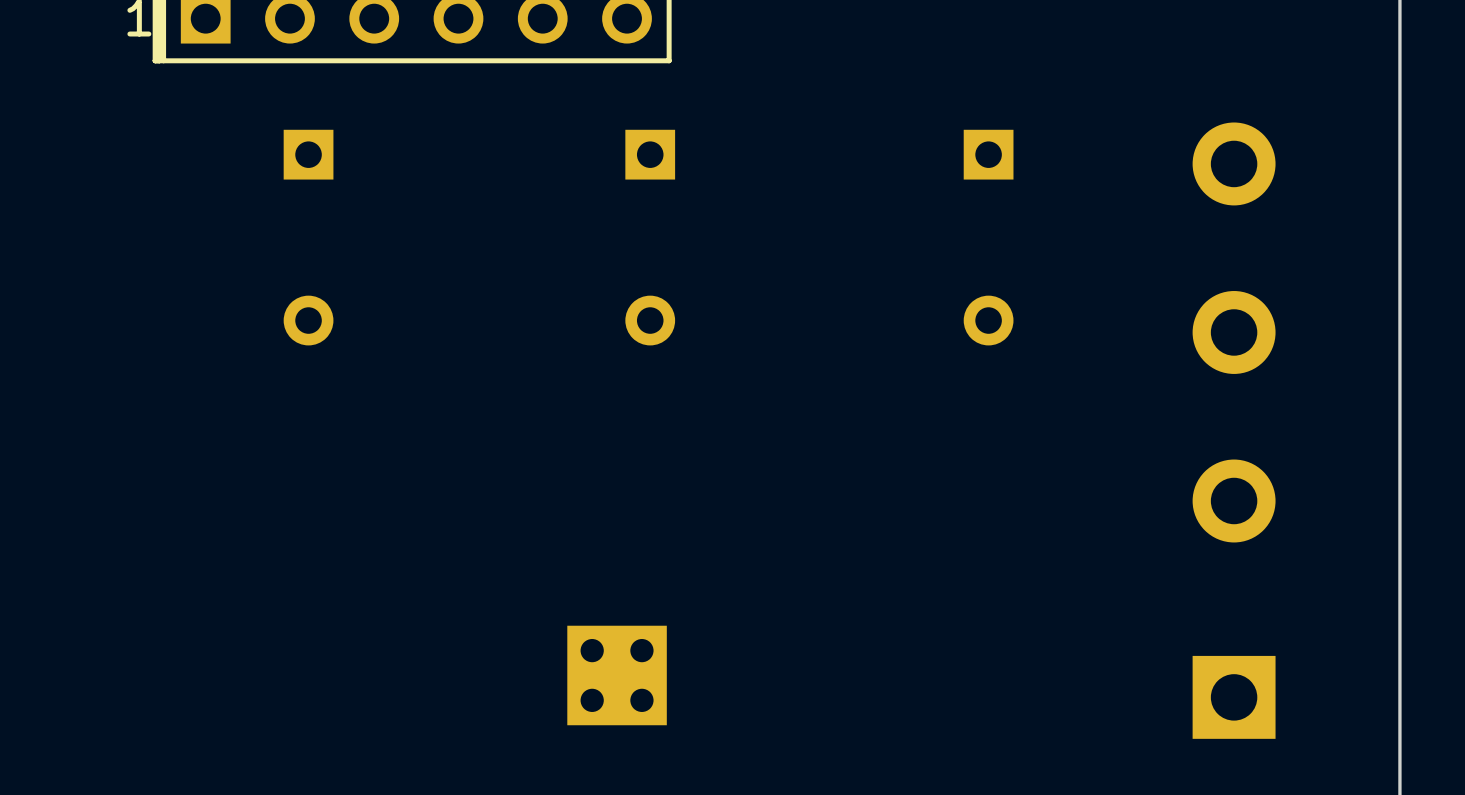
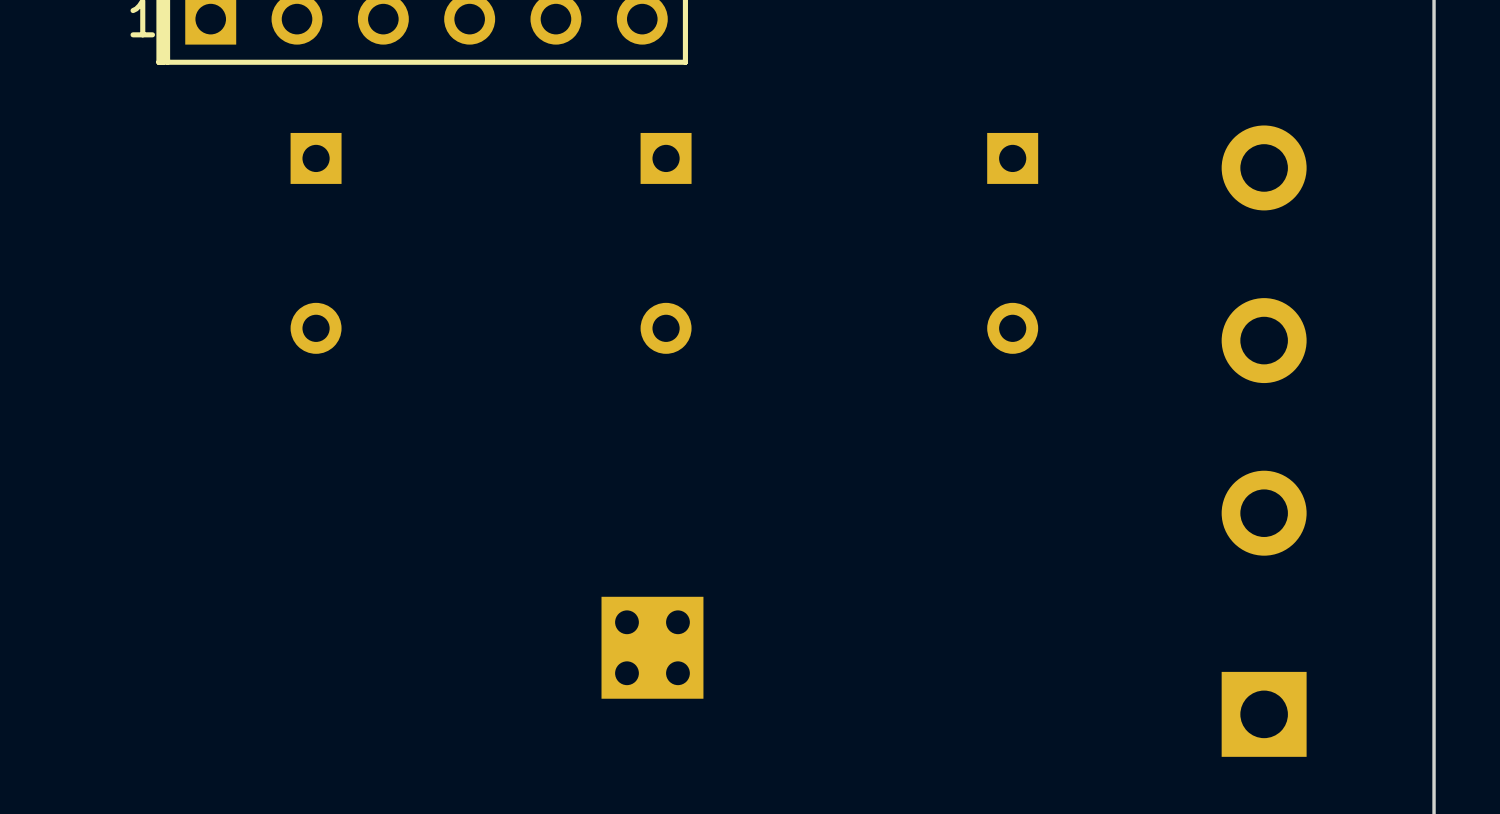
part position: (617, 675) -> (652, 647)

